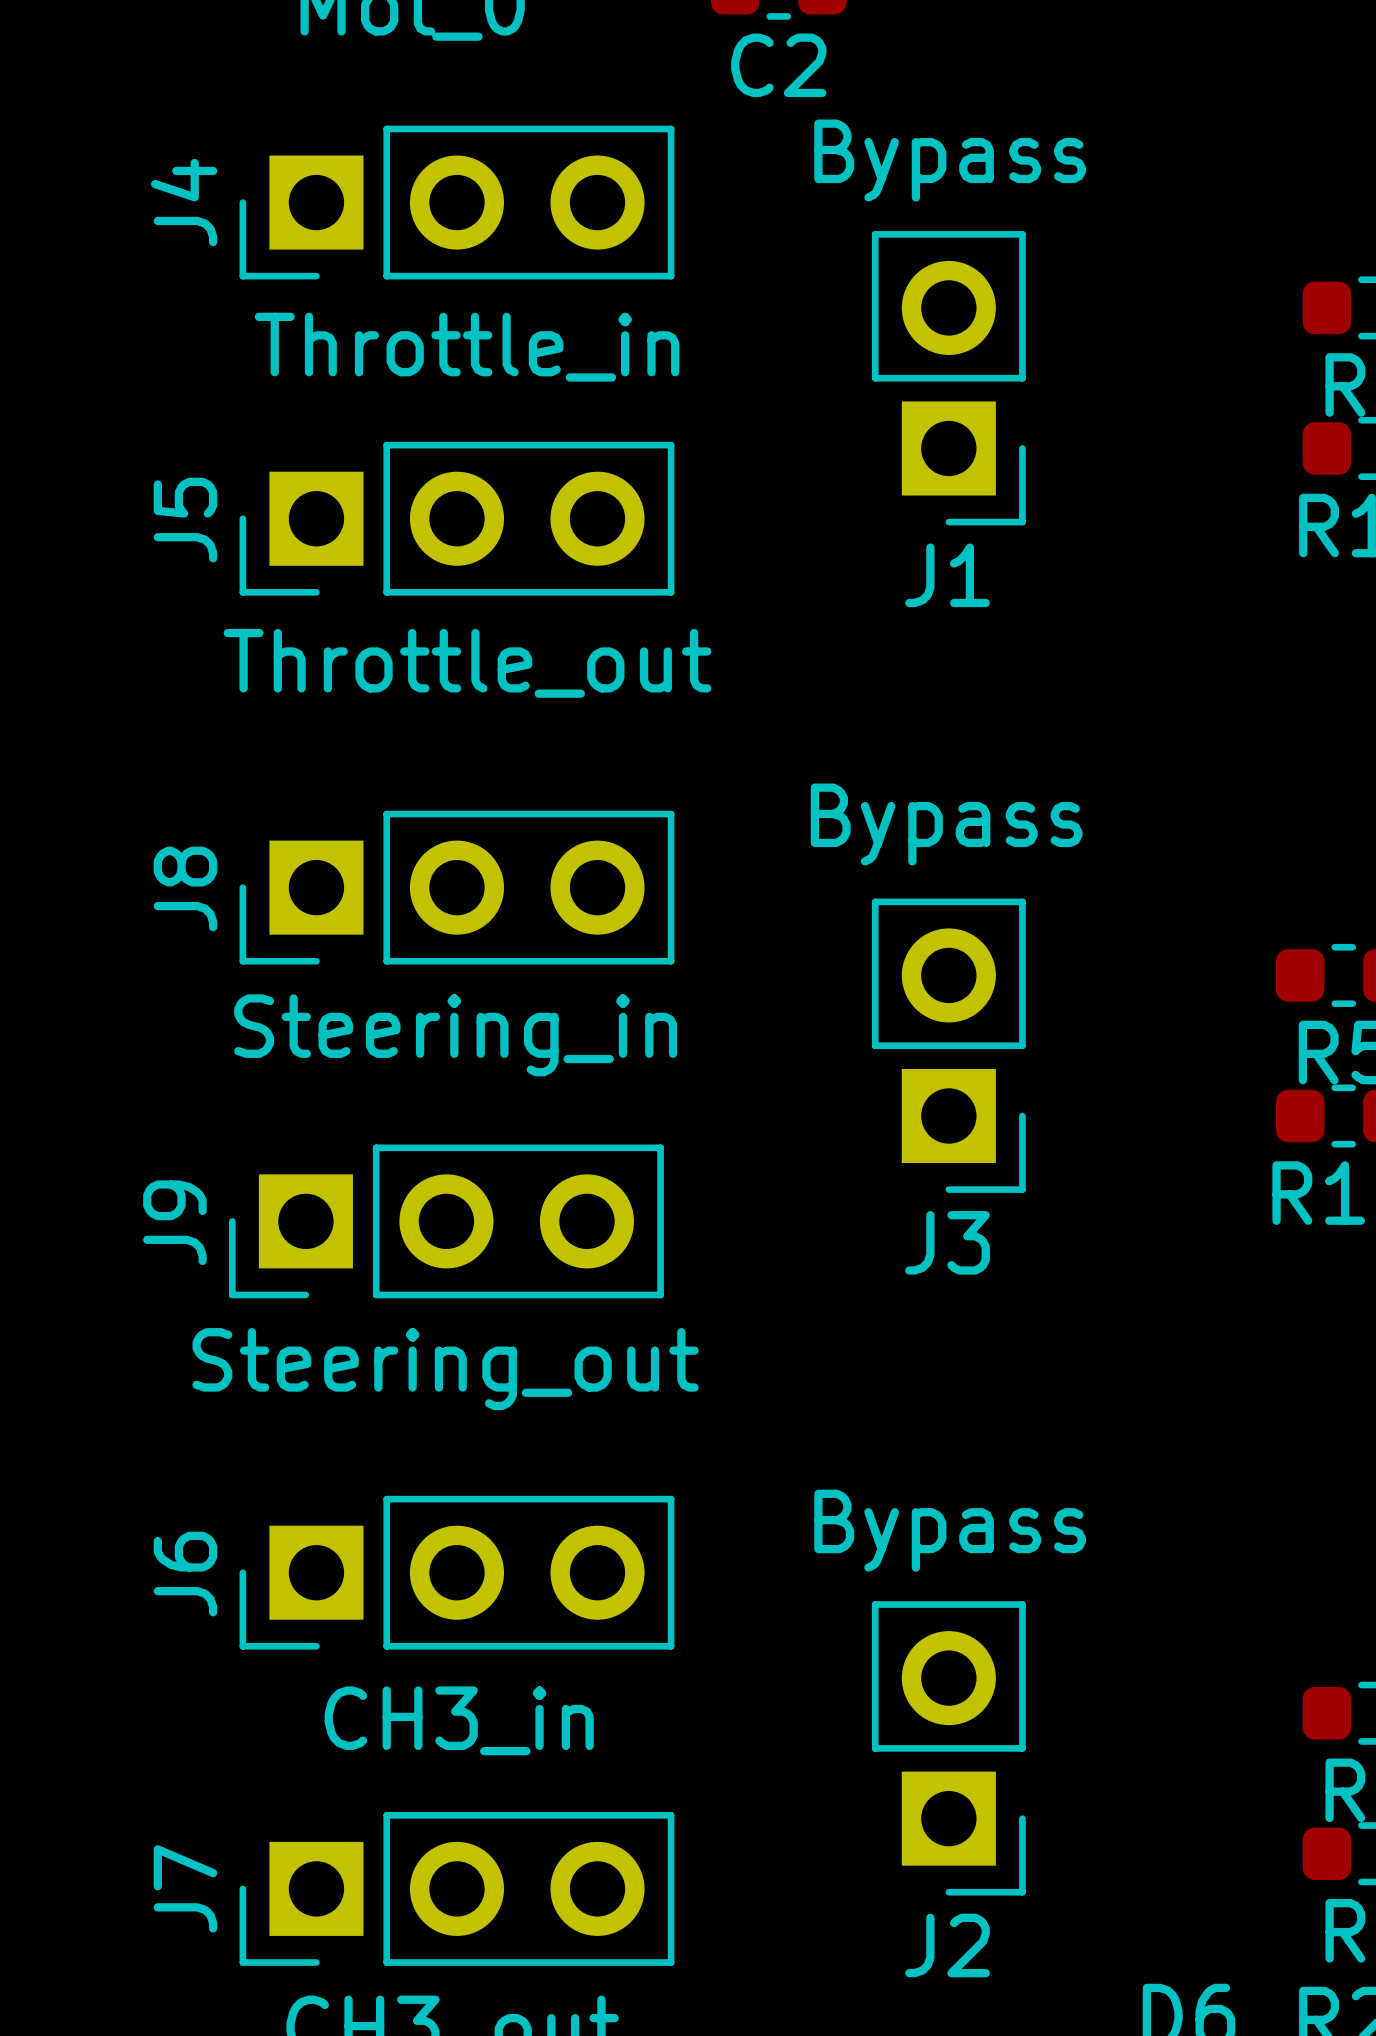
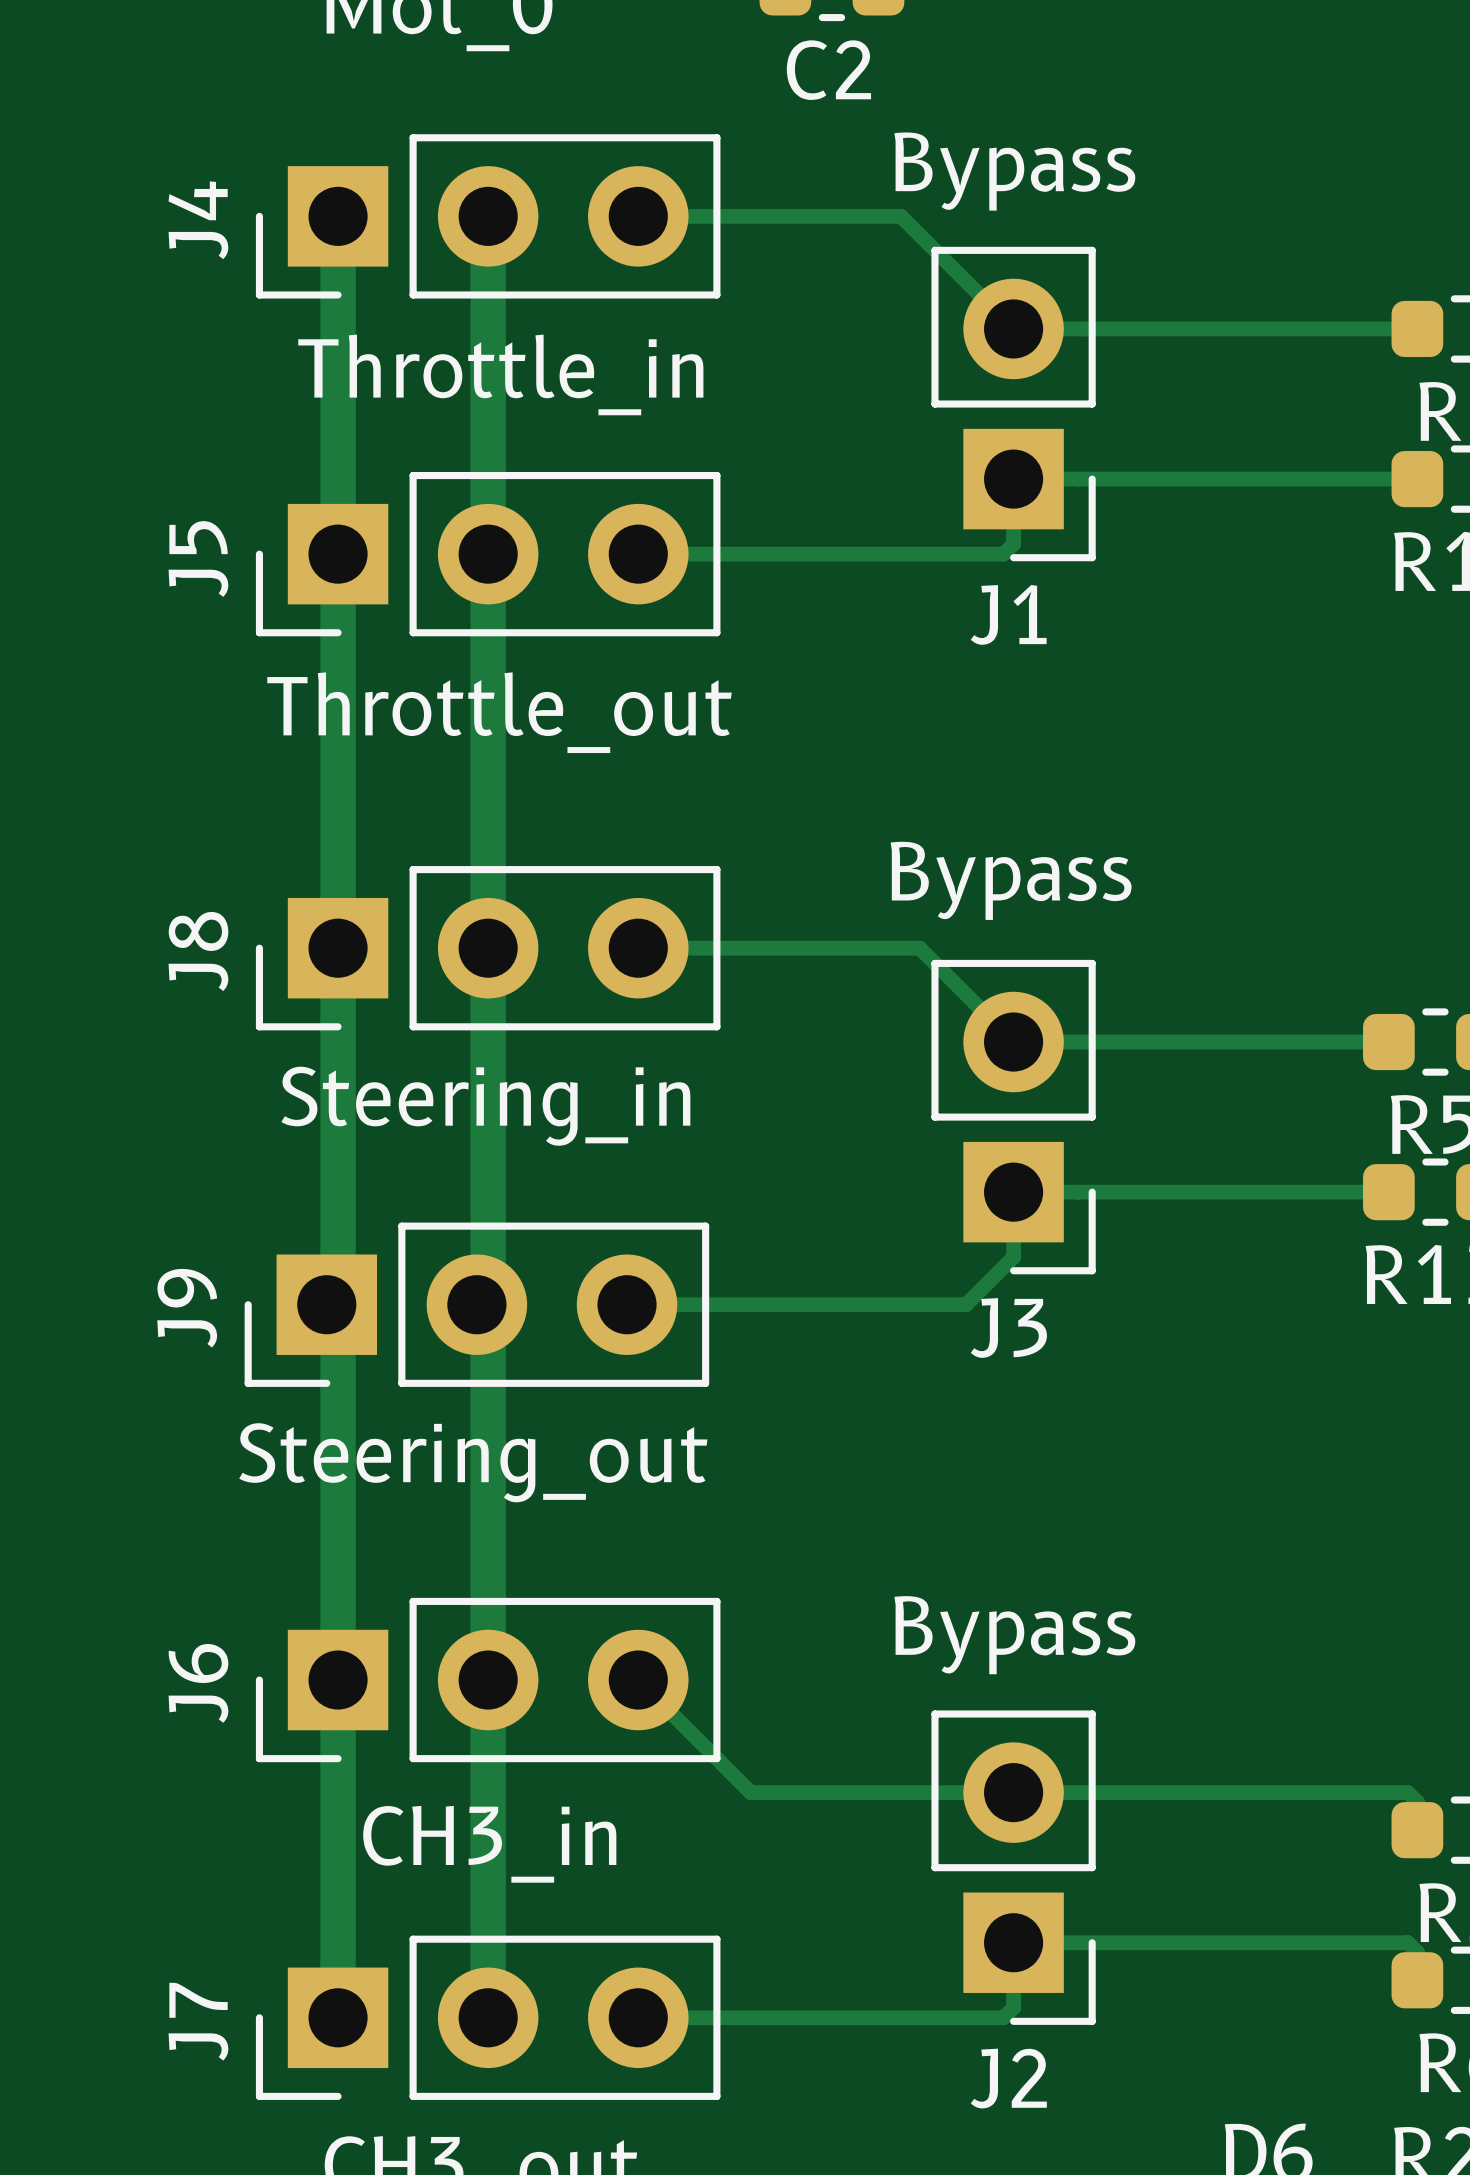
track: none -> (338, 216) (338, 2017)
track: none -> (488, 216) (488, 2017)
track: none -> (638, 216) (900, 216) (1013, 328) (1417, 328)
track: none -> (1417, 479) (1013, 479) (1013, 544) (1003, 554) (638, 554)
track: none -> (638, 948) (919, 948) (1013, 1042) (1388, 1042)
track: none -> (1388, 1192) (1013, 1192) (1013, 1257) (966, 1304) (627, 1304)
track: none -> (638, 1680) (750, 1792) (1407, 1792) (1417, 1802) (1417, 1830)
track: none -> (1417, 1980) (1417, 1952) (1407, 1942) (1013, 1942) (1013, 2007) (1003, 2017) (638, 2017)

